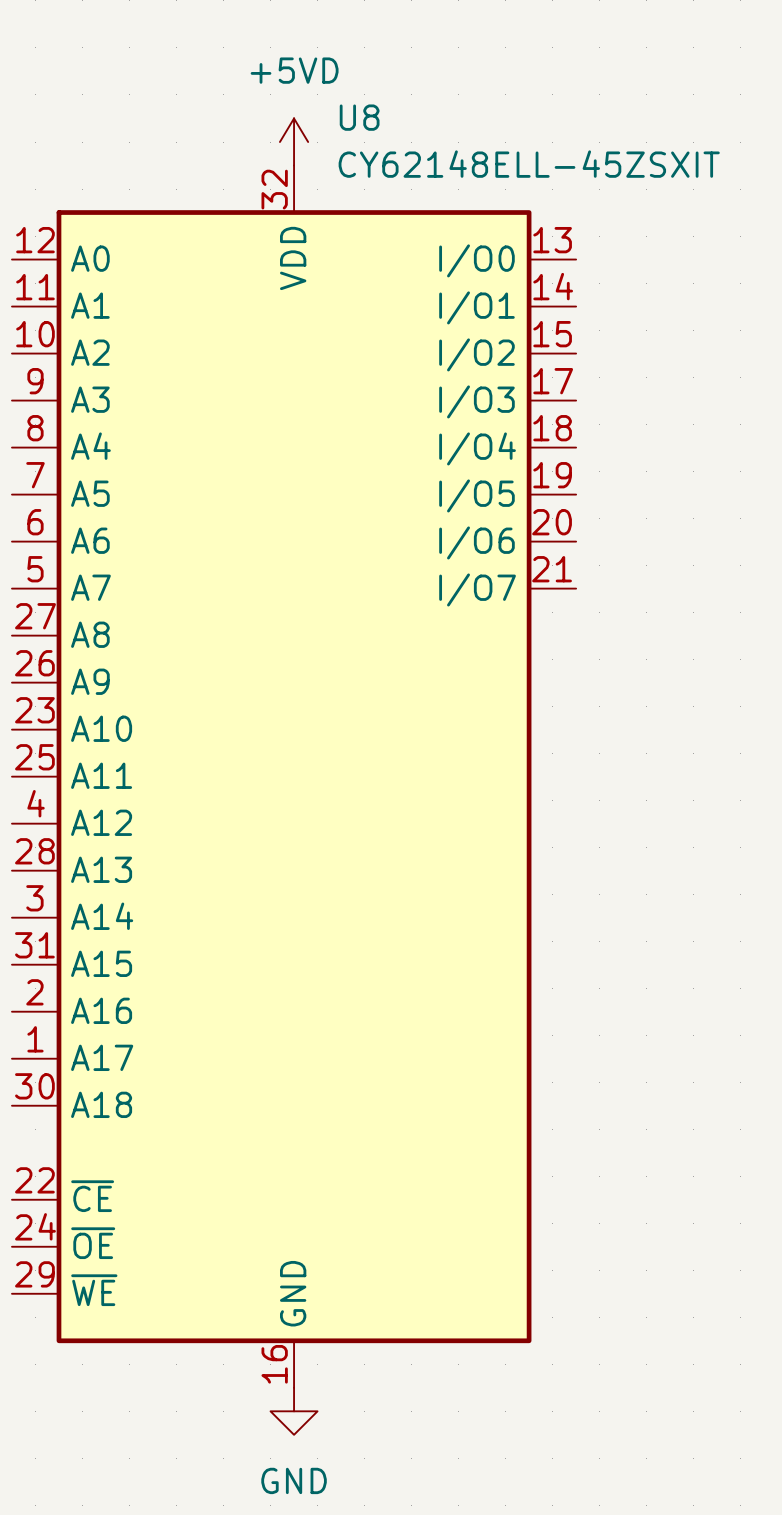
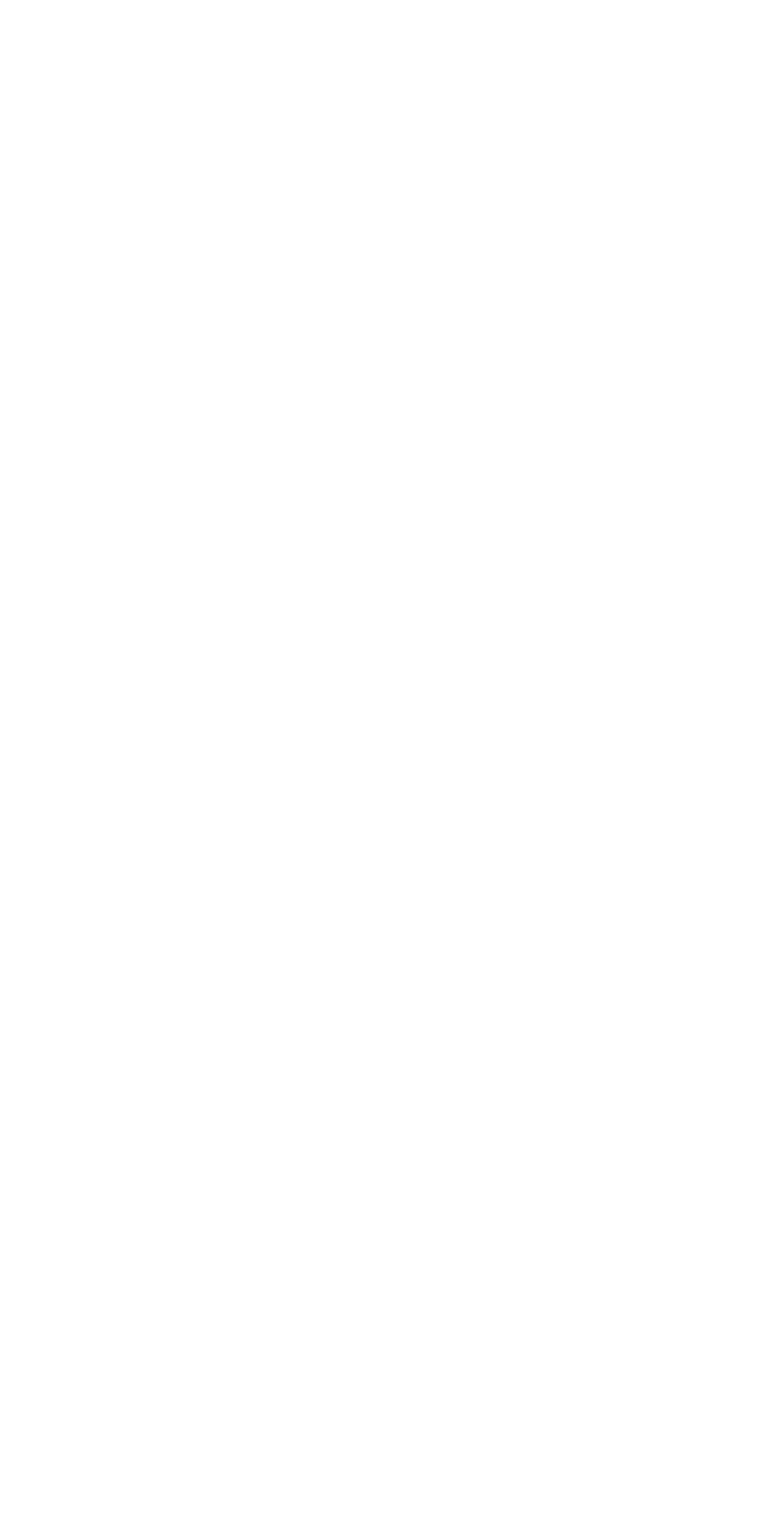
power symbol: +5VD (294, 142) -> none
U8: CY62148ELL-45ZSXIT (294, 776) -> none
power symbol: GND (294, 1411) -> none

